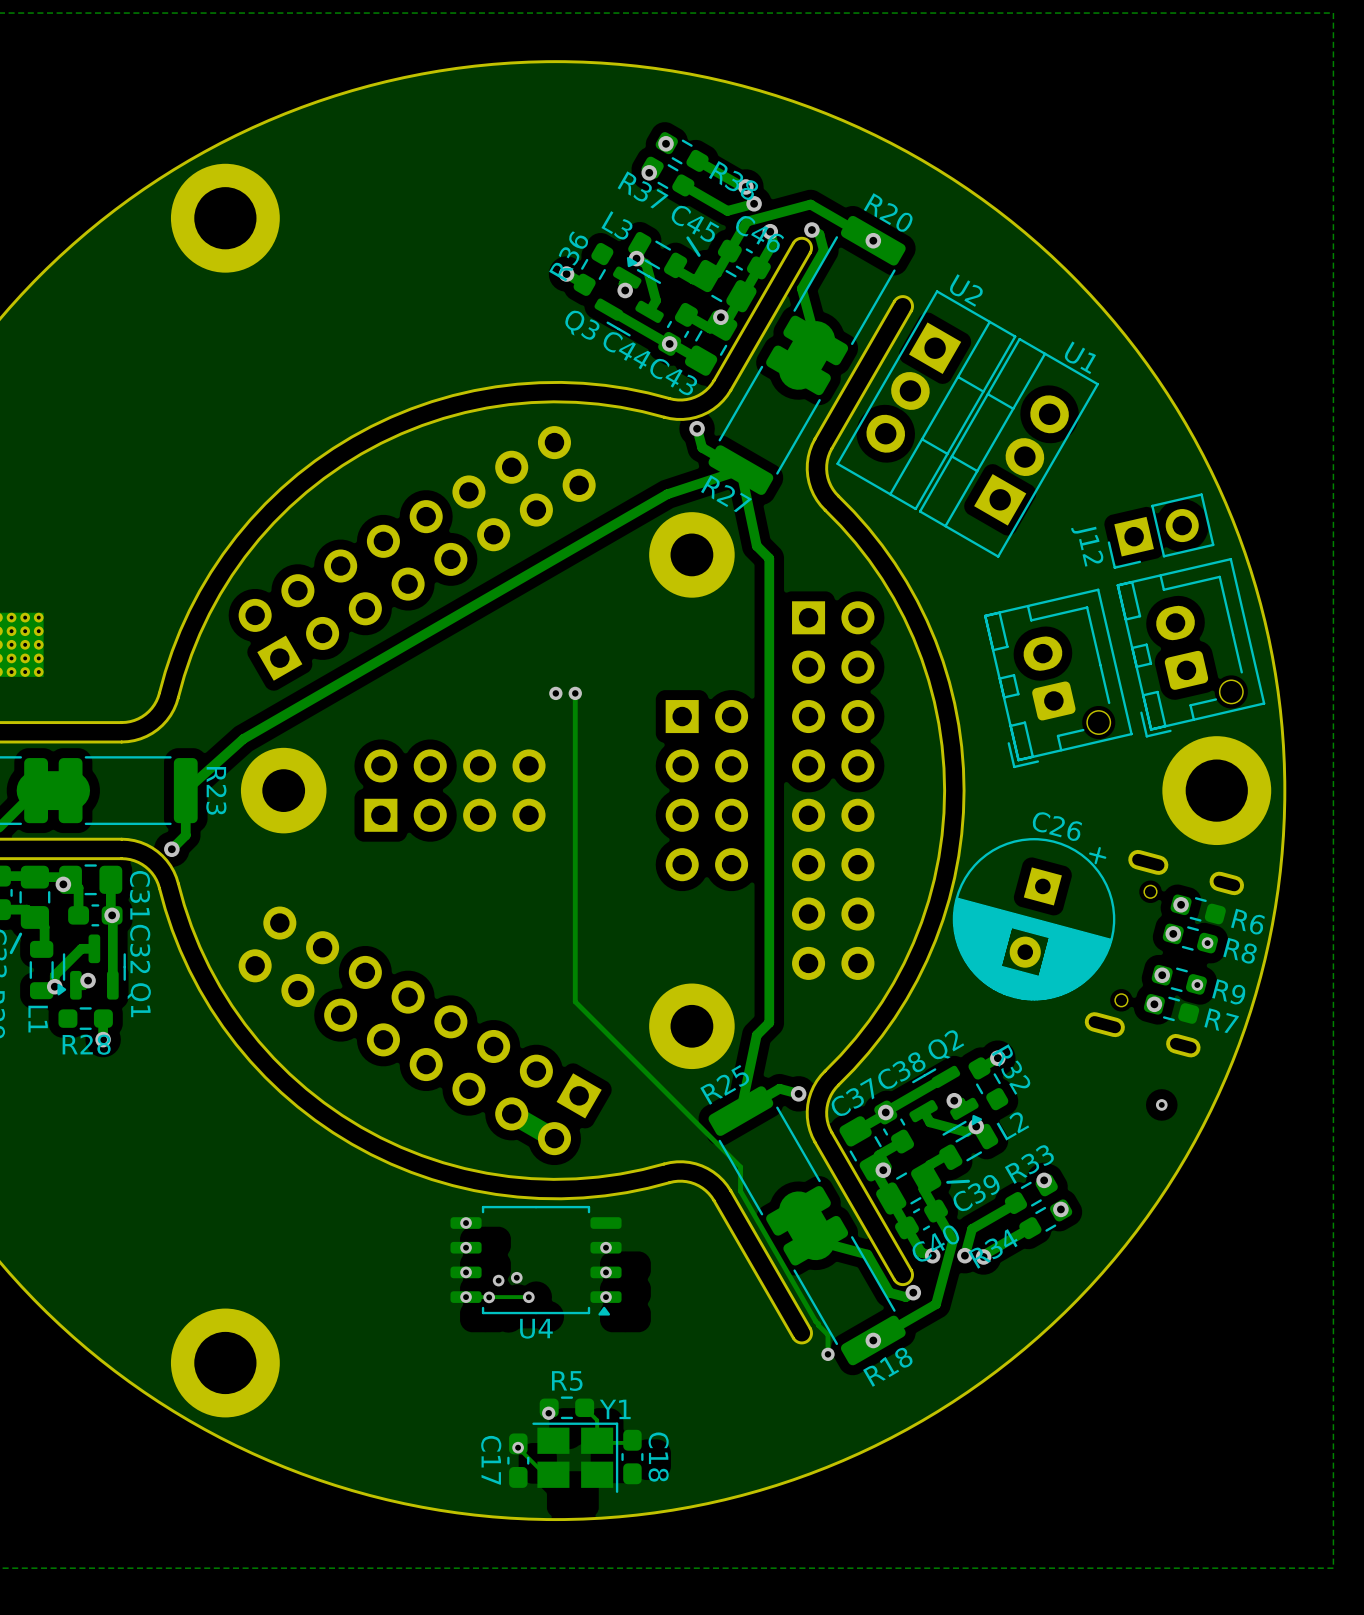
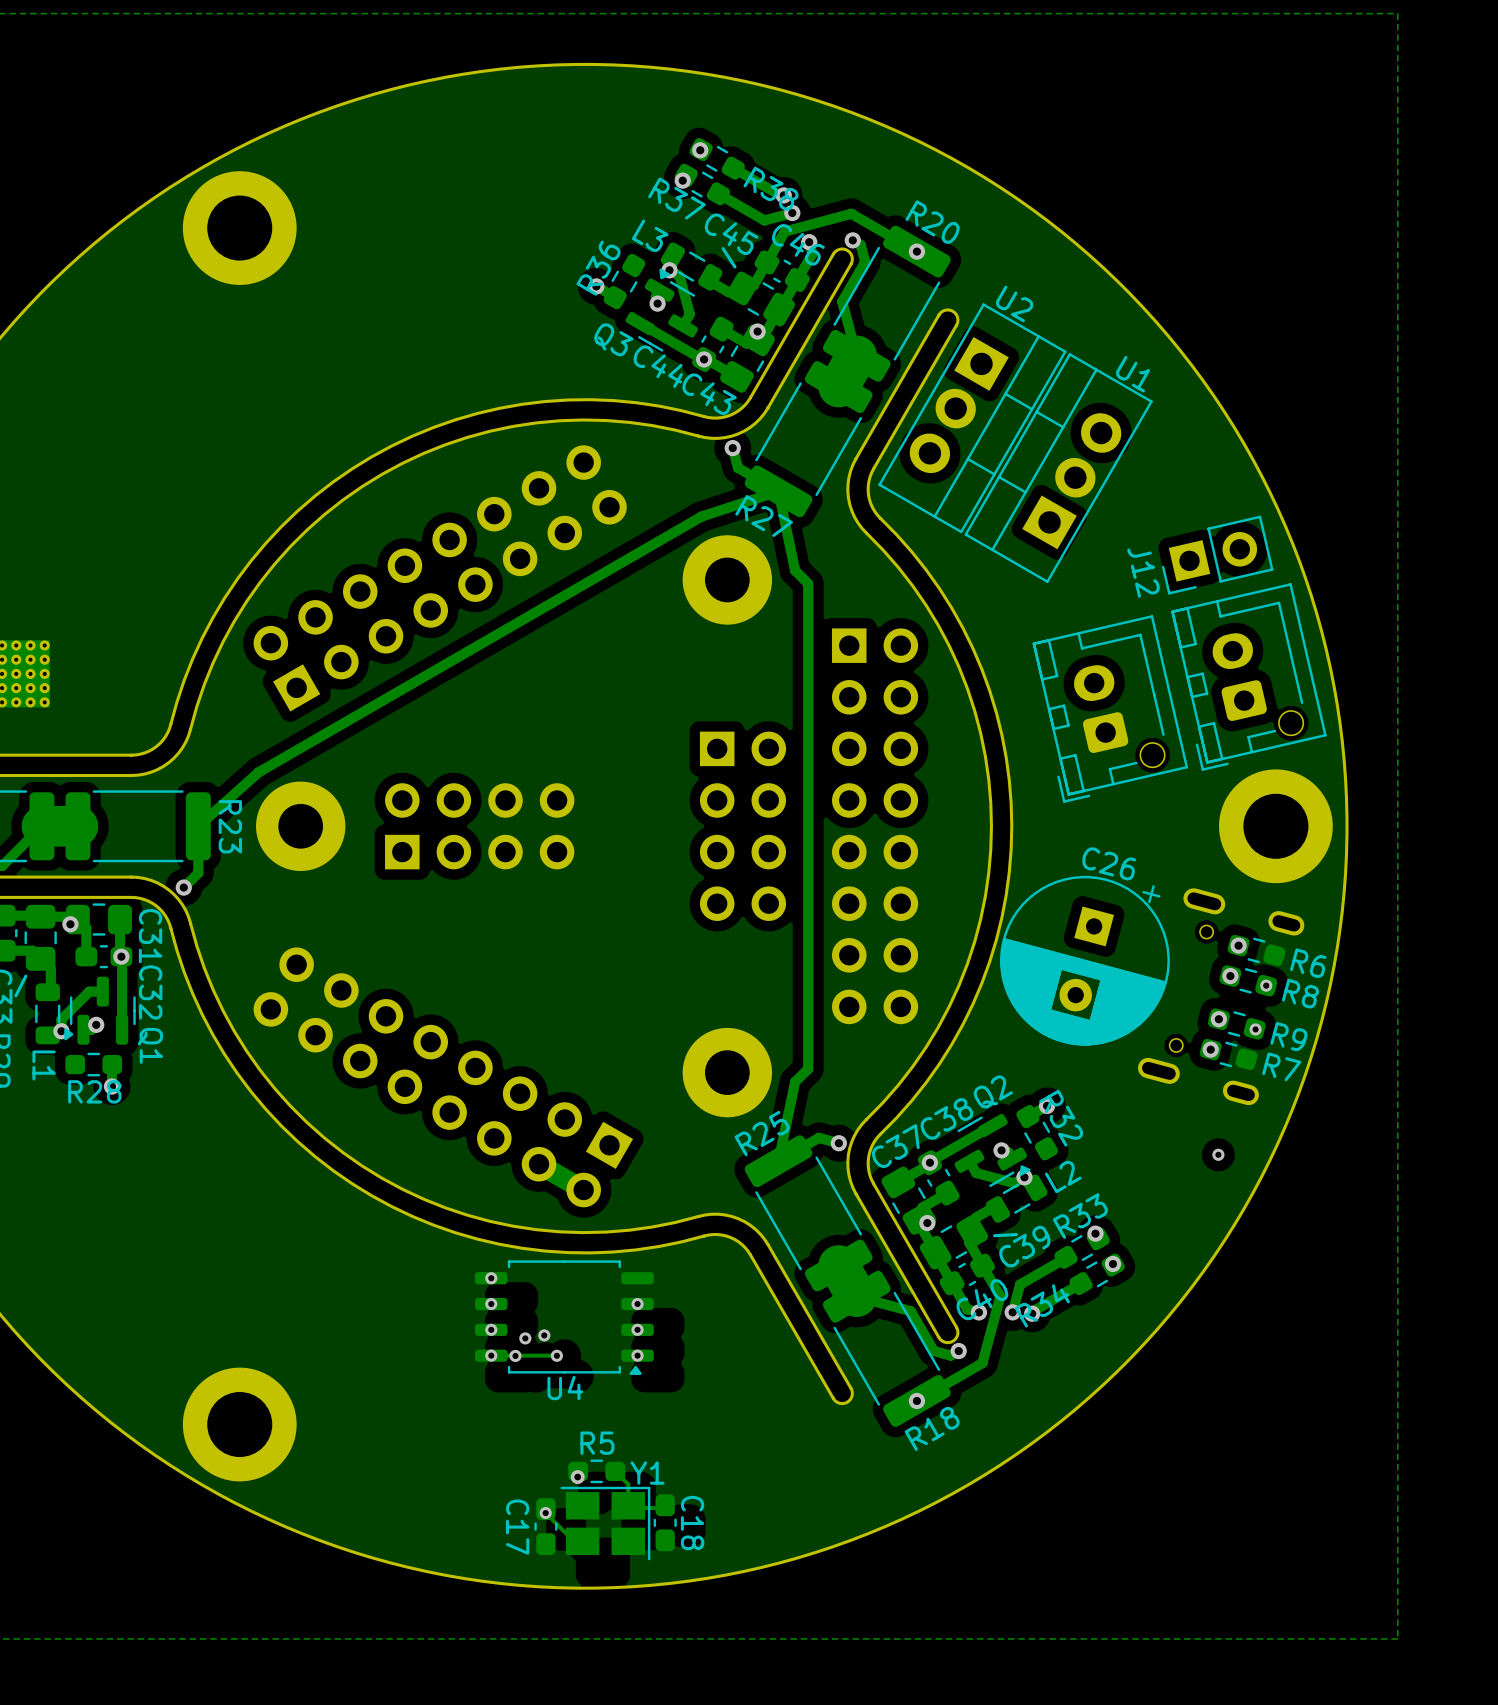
via: (555, 693) -> none
track: (575, 693) (575, 1001) (740, 1167) (740, 1191) (815, 1321) (828, 1334) (828, 1354) -> none
via: (575, 693) -> none
via: (828, 1354) -> none

